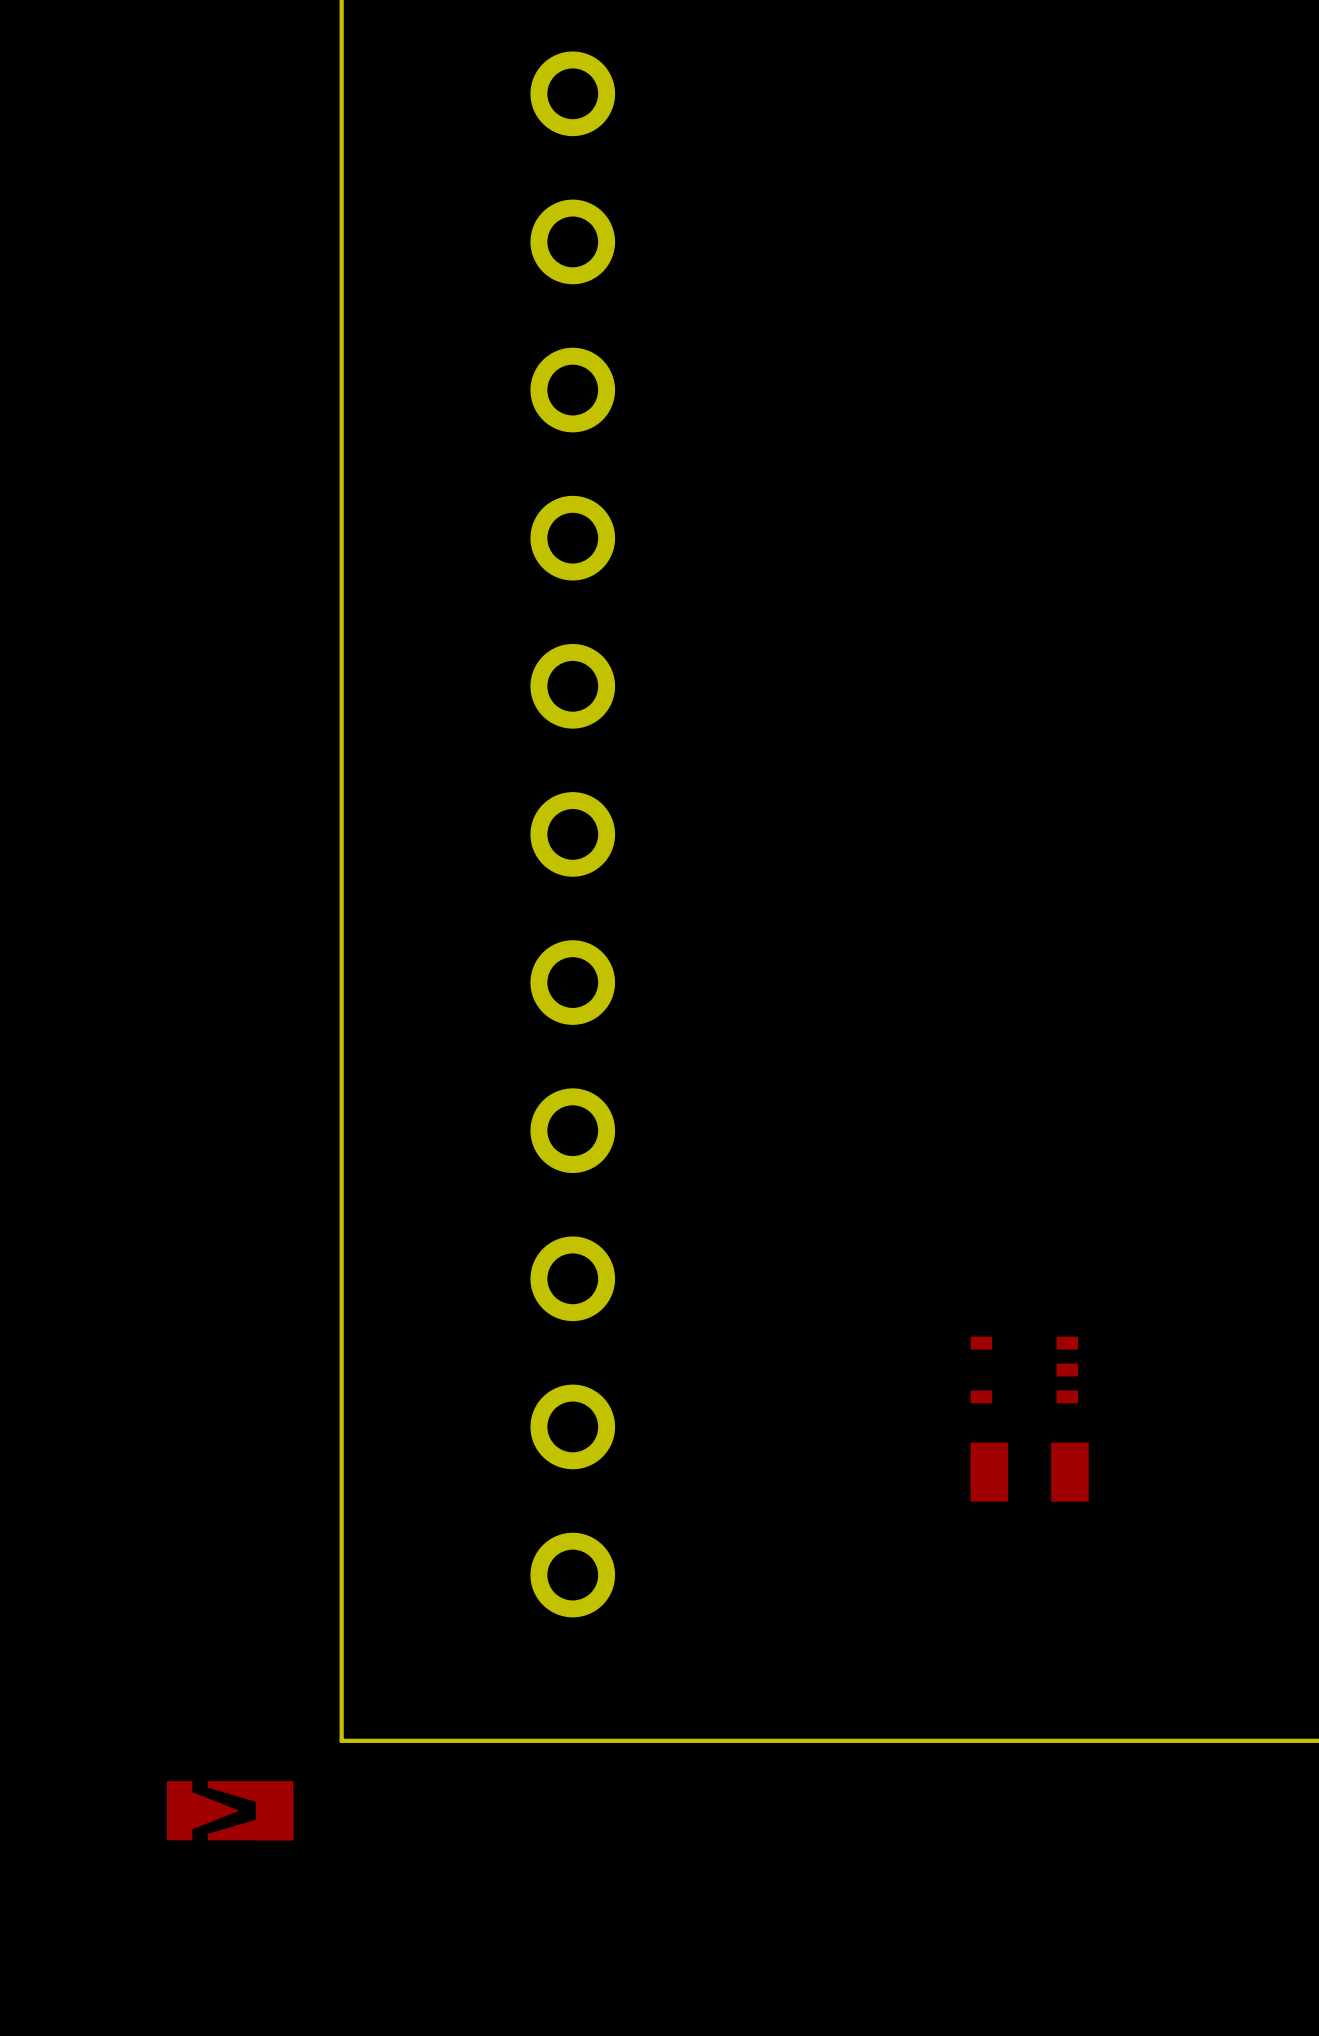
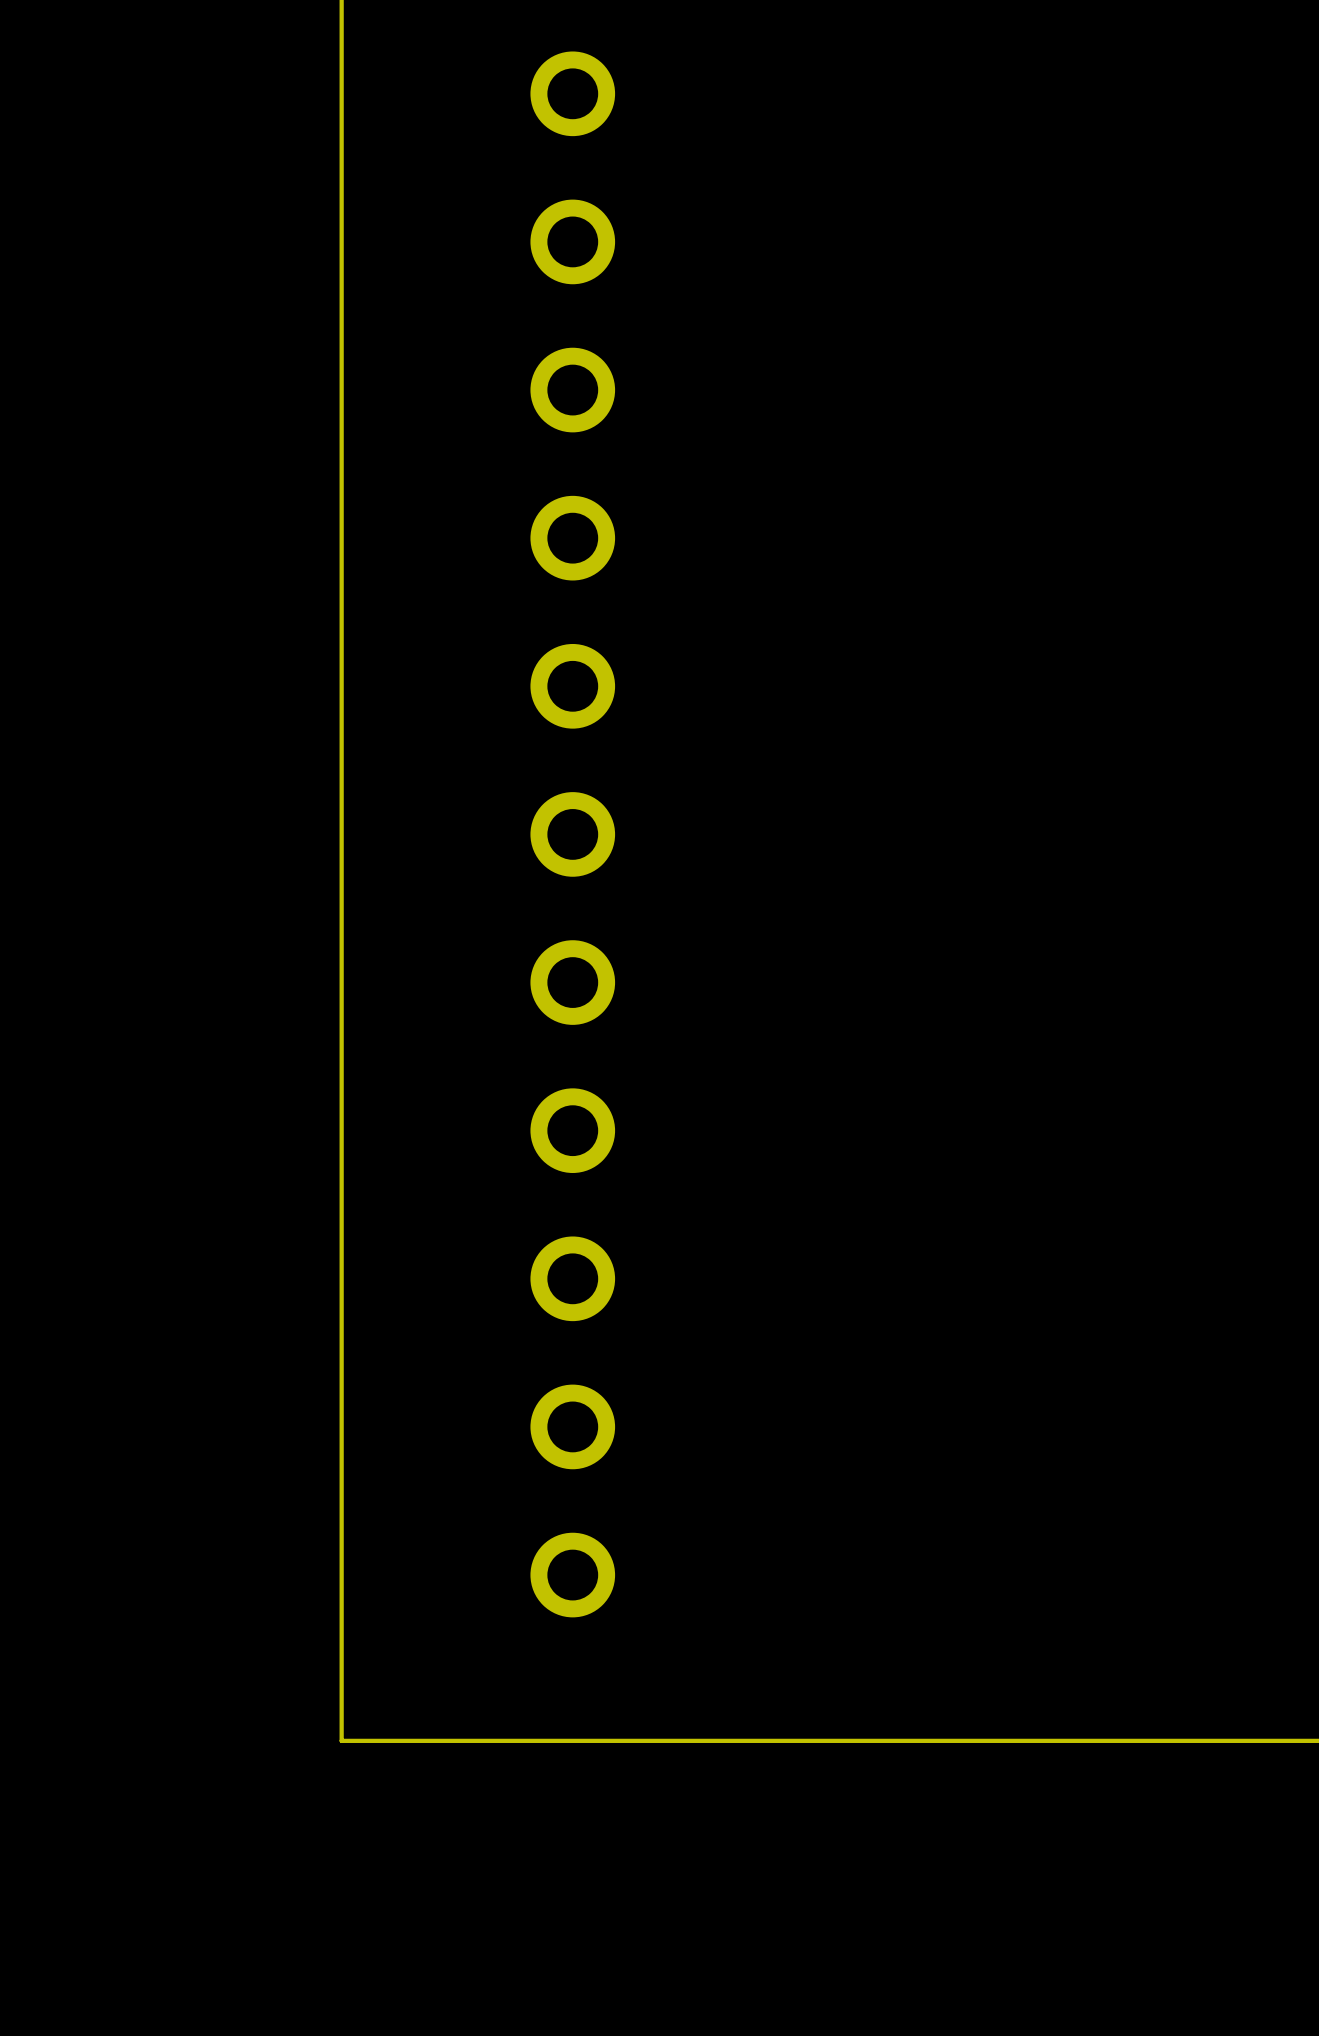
part: (1024, 1370) -> none
part: (1029, 1472) -> none
part: (230, 1810) -> none

